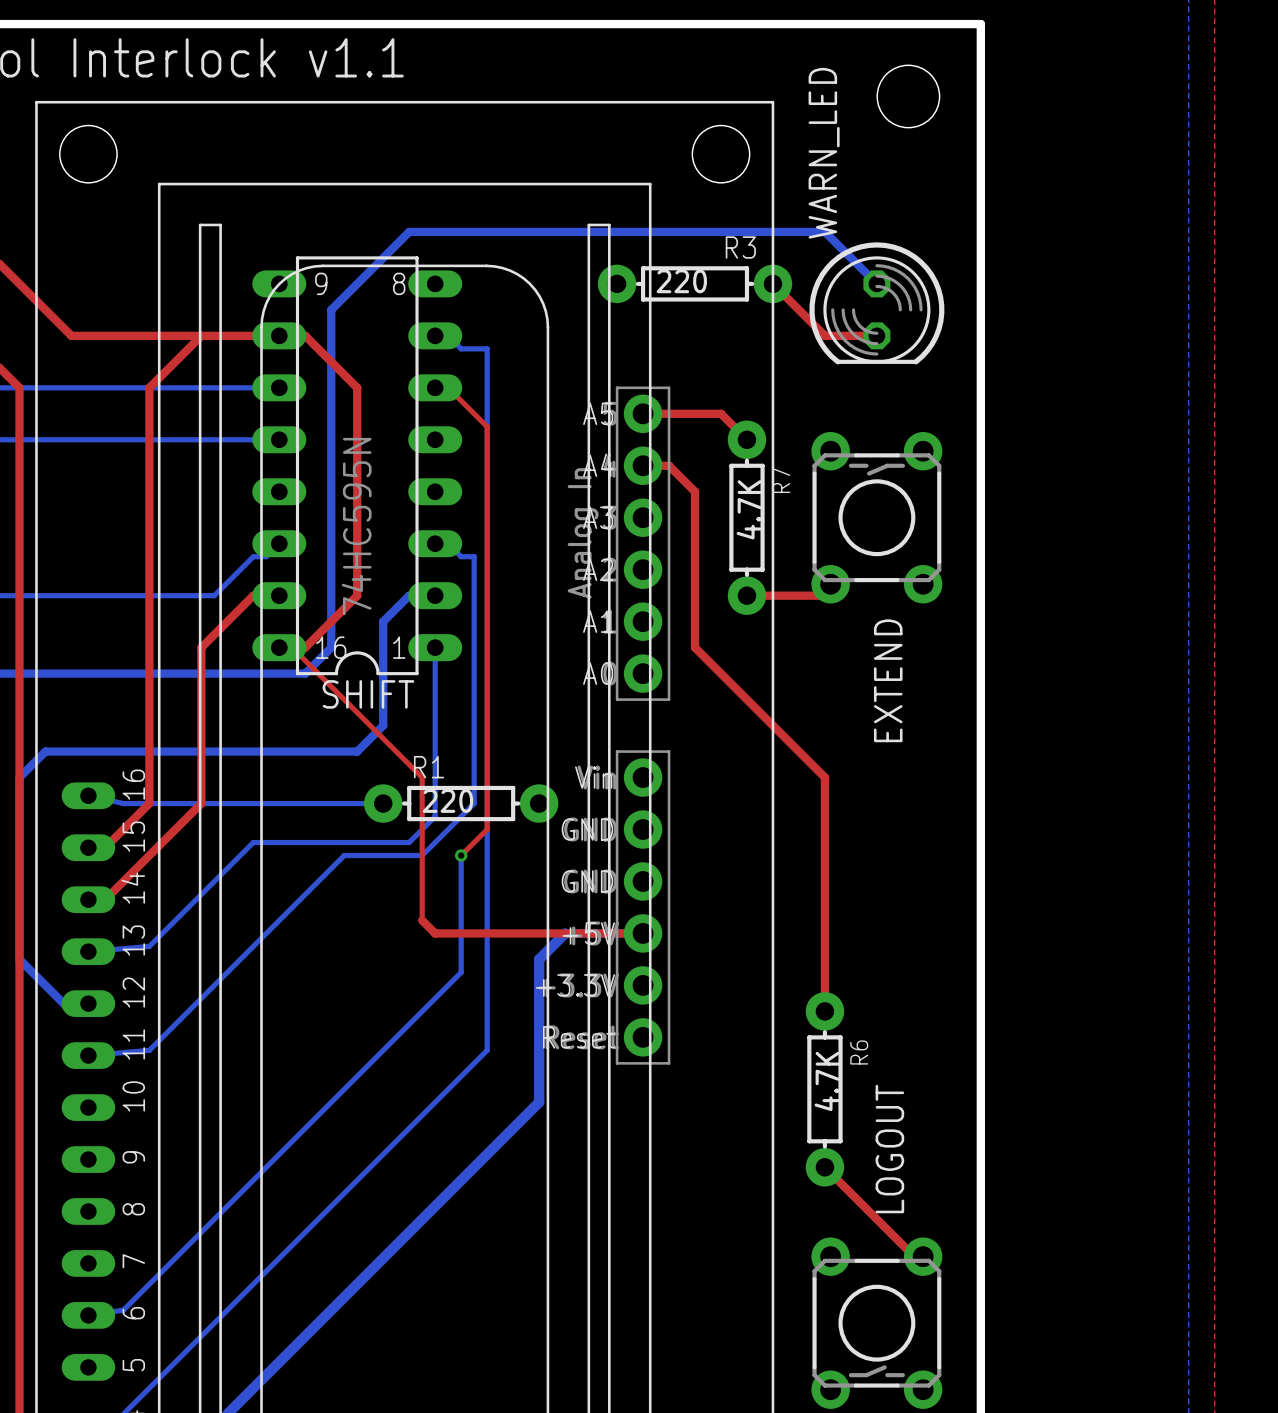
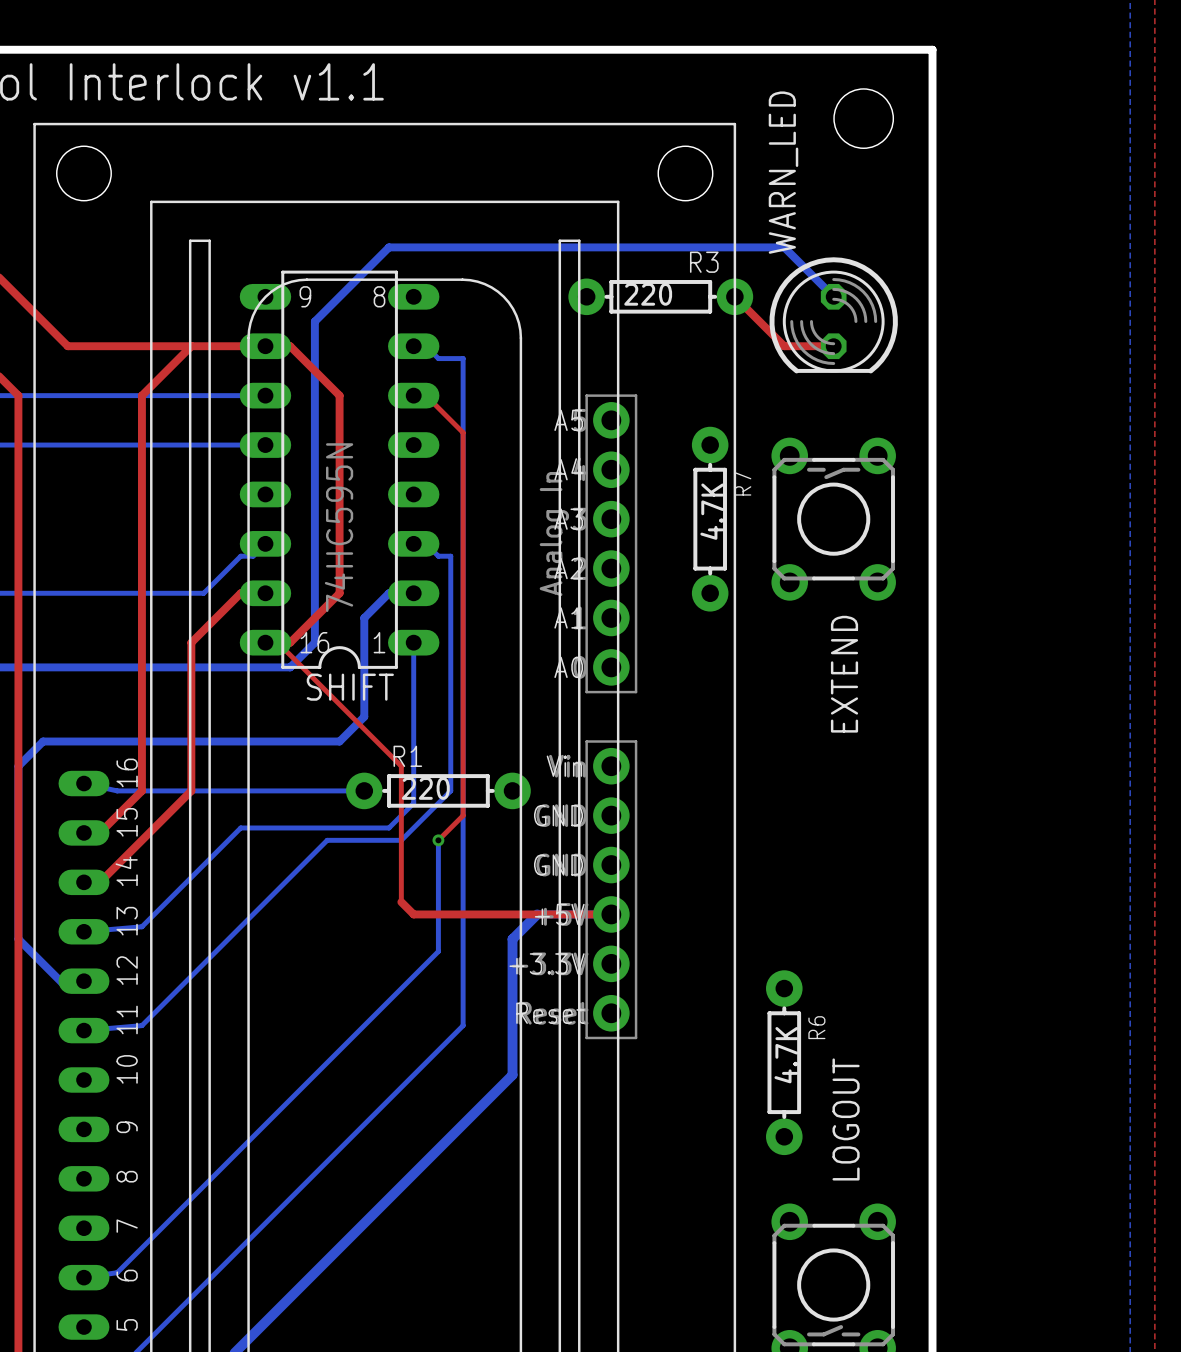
top track: (643, 413) (721, 413) (746, 439) -> none
top track: (643, 465) (669, 465) (695, 491) (695, 647) (824, 777) (824, 1011) -> none
top track: (830, 584) (830, 589) (824, 595) (746, 595) -> none
top track: (824, 1167) (914, 1256) (923, 1256) -> none

